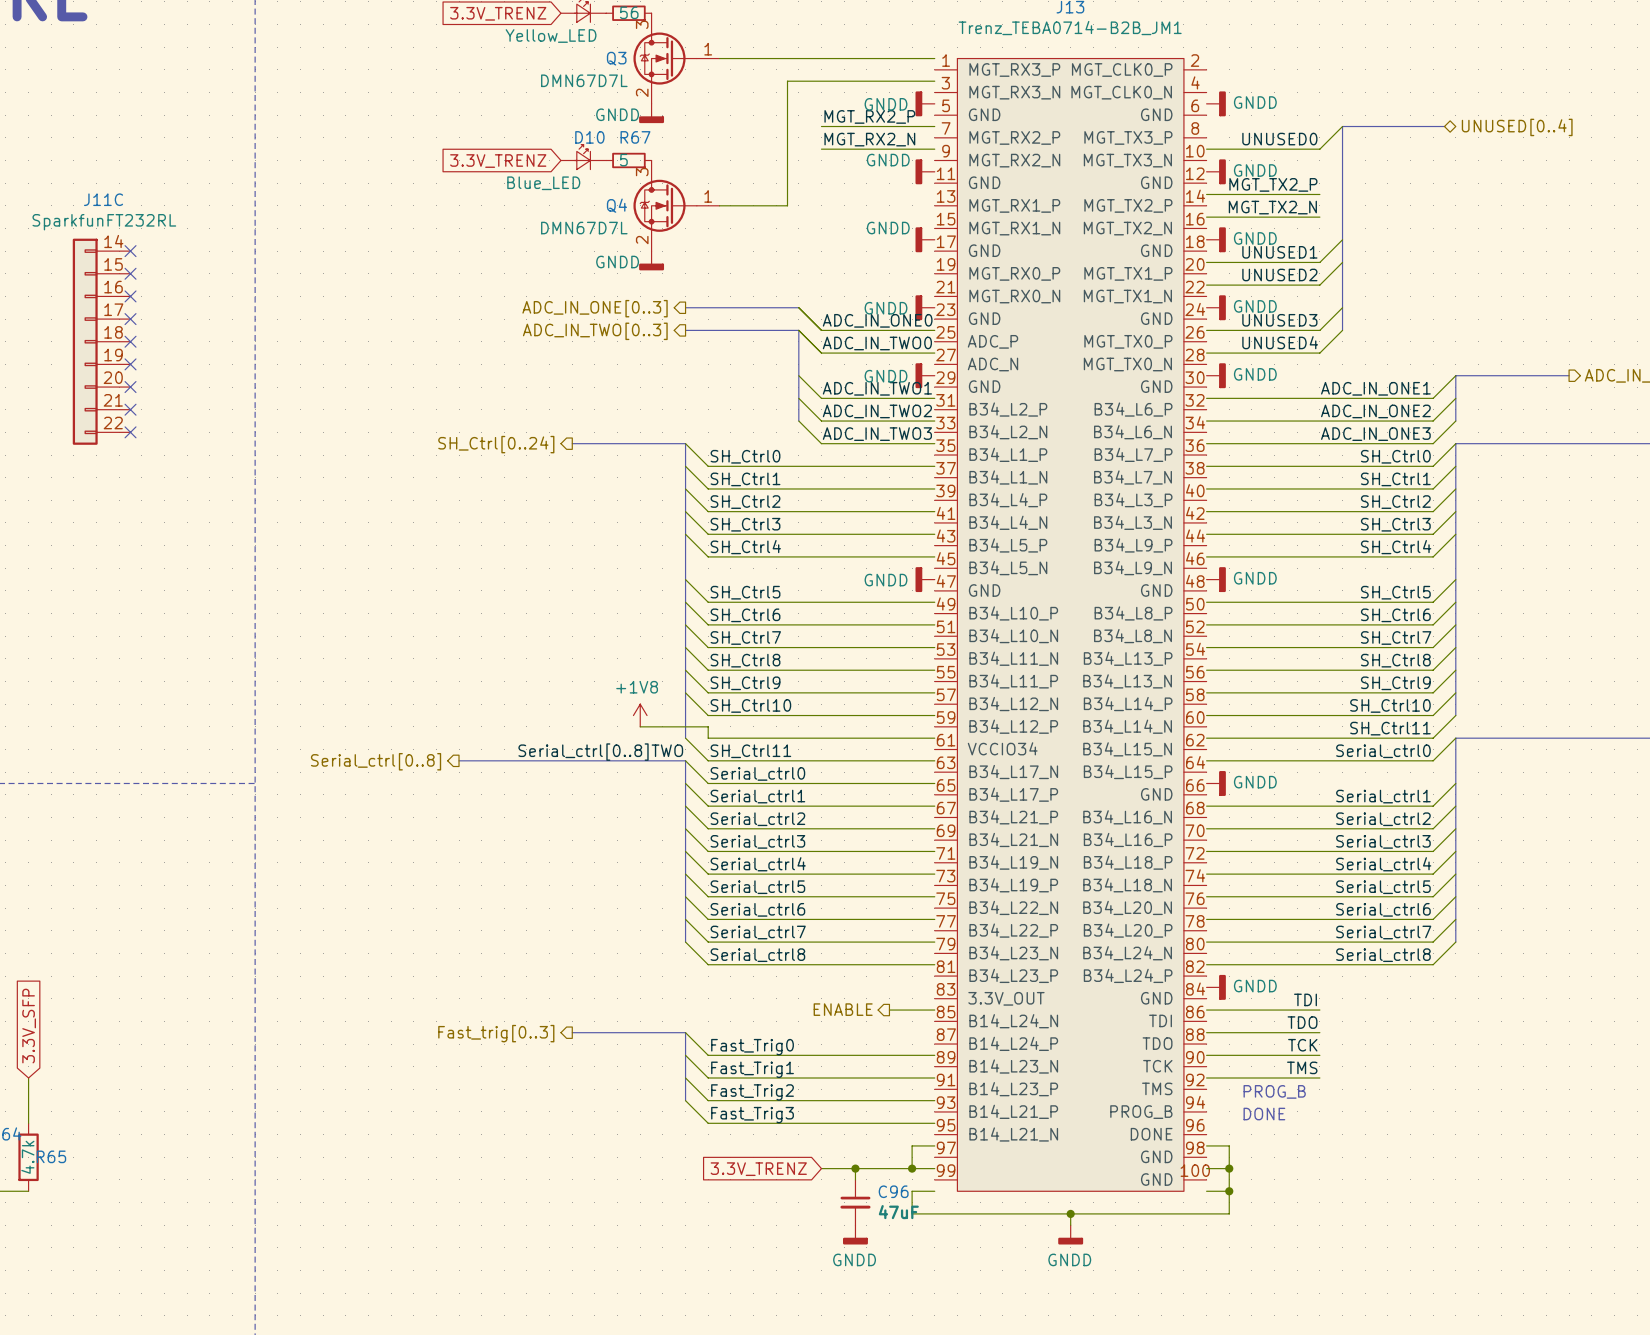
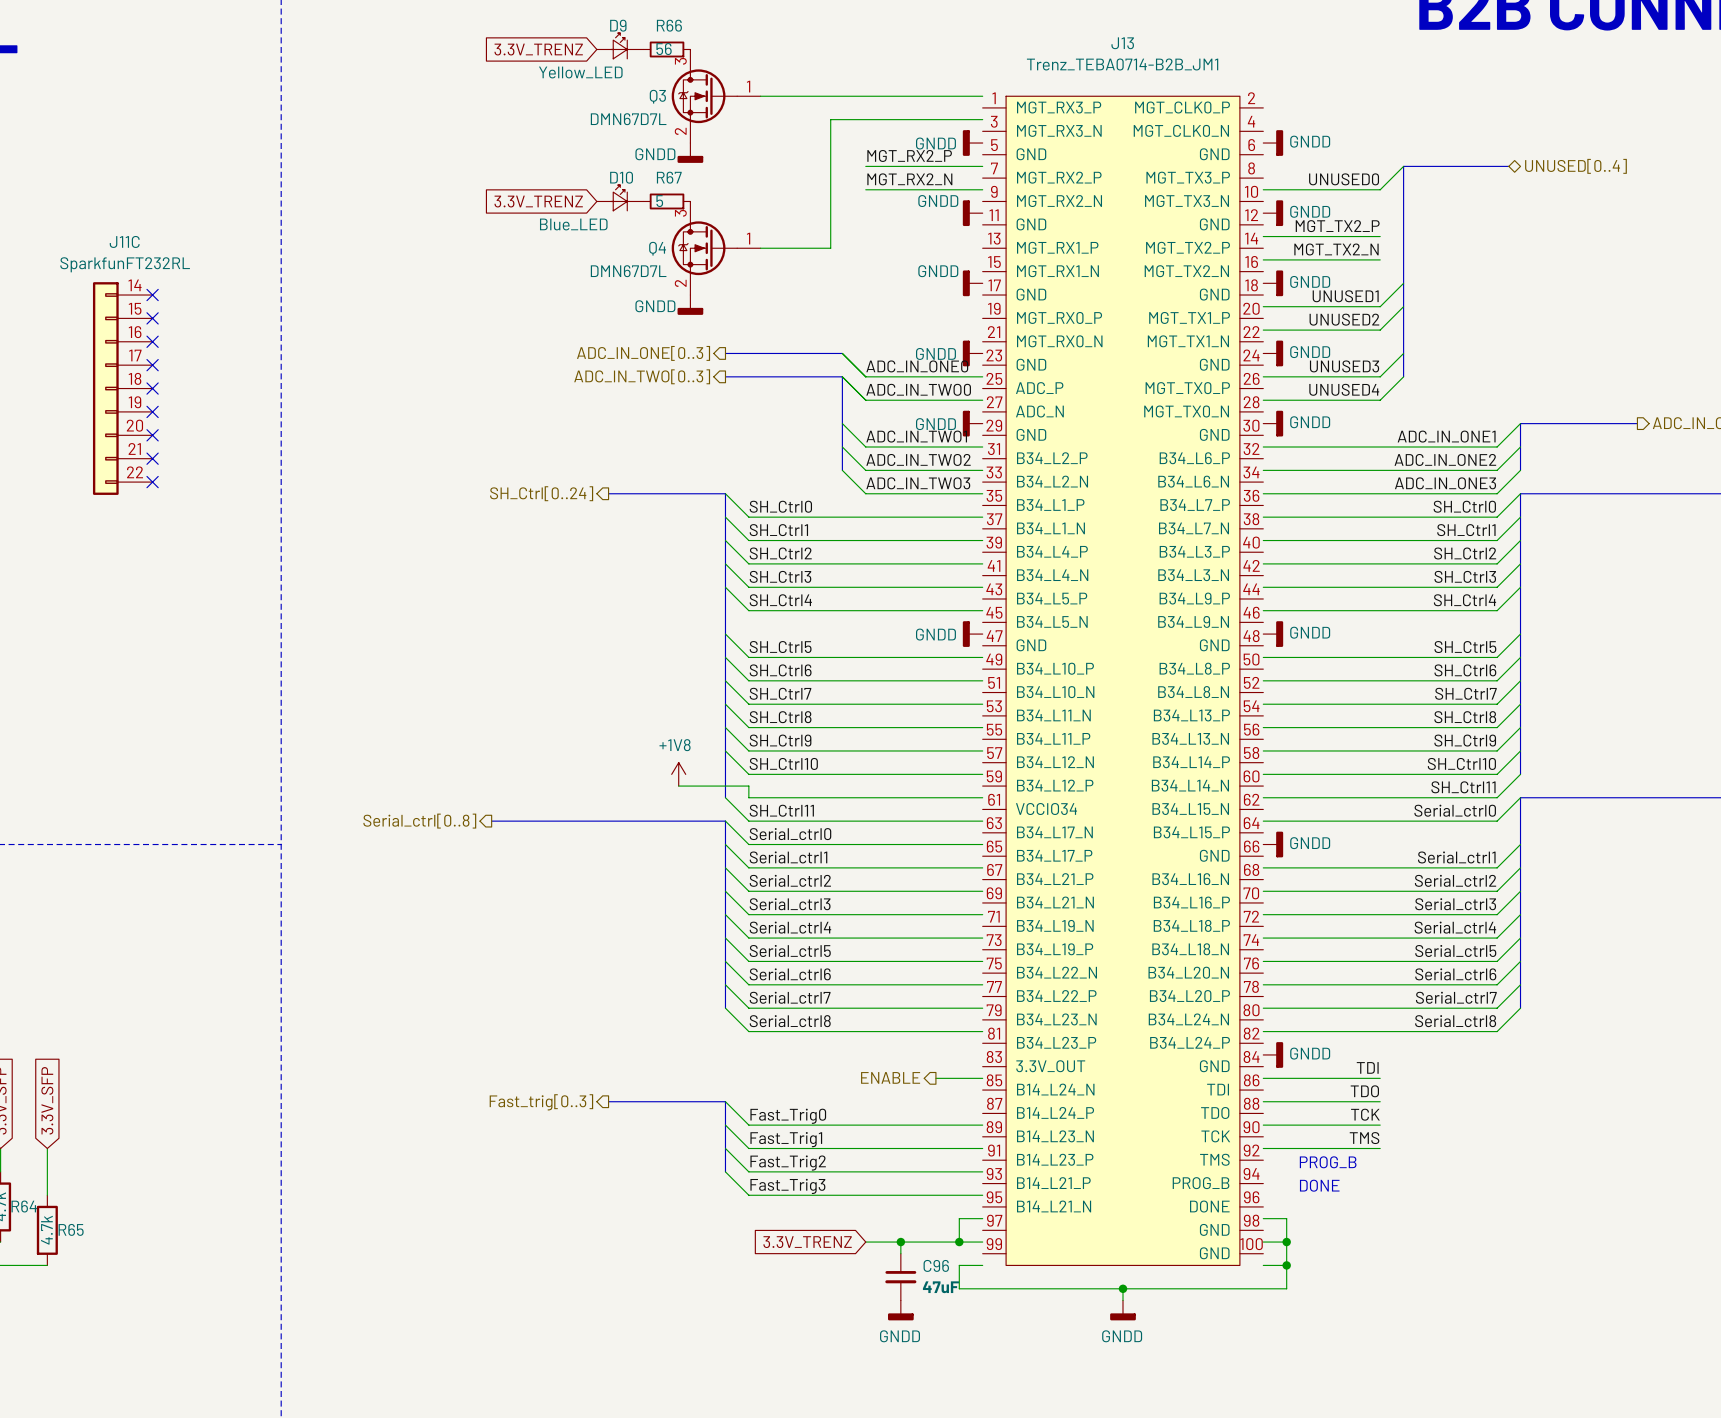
label: Serial_ctrl[0..8]TWO (600, 752) -> none

